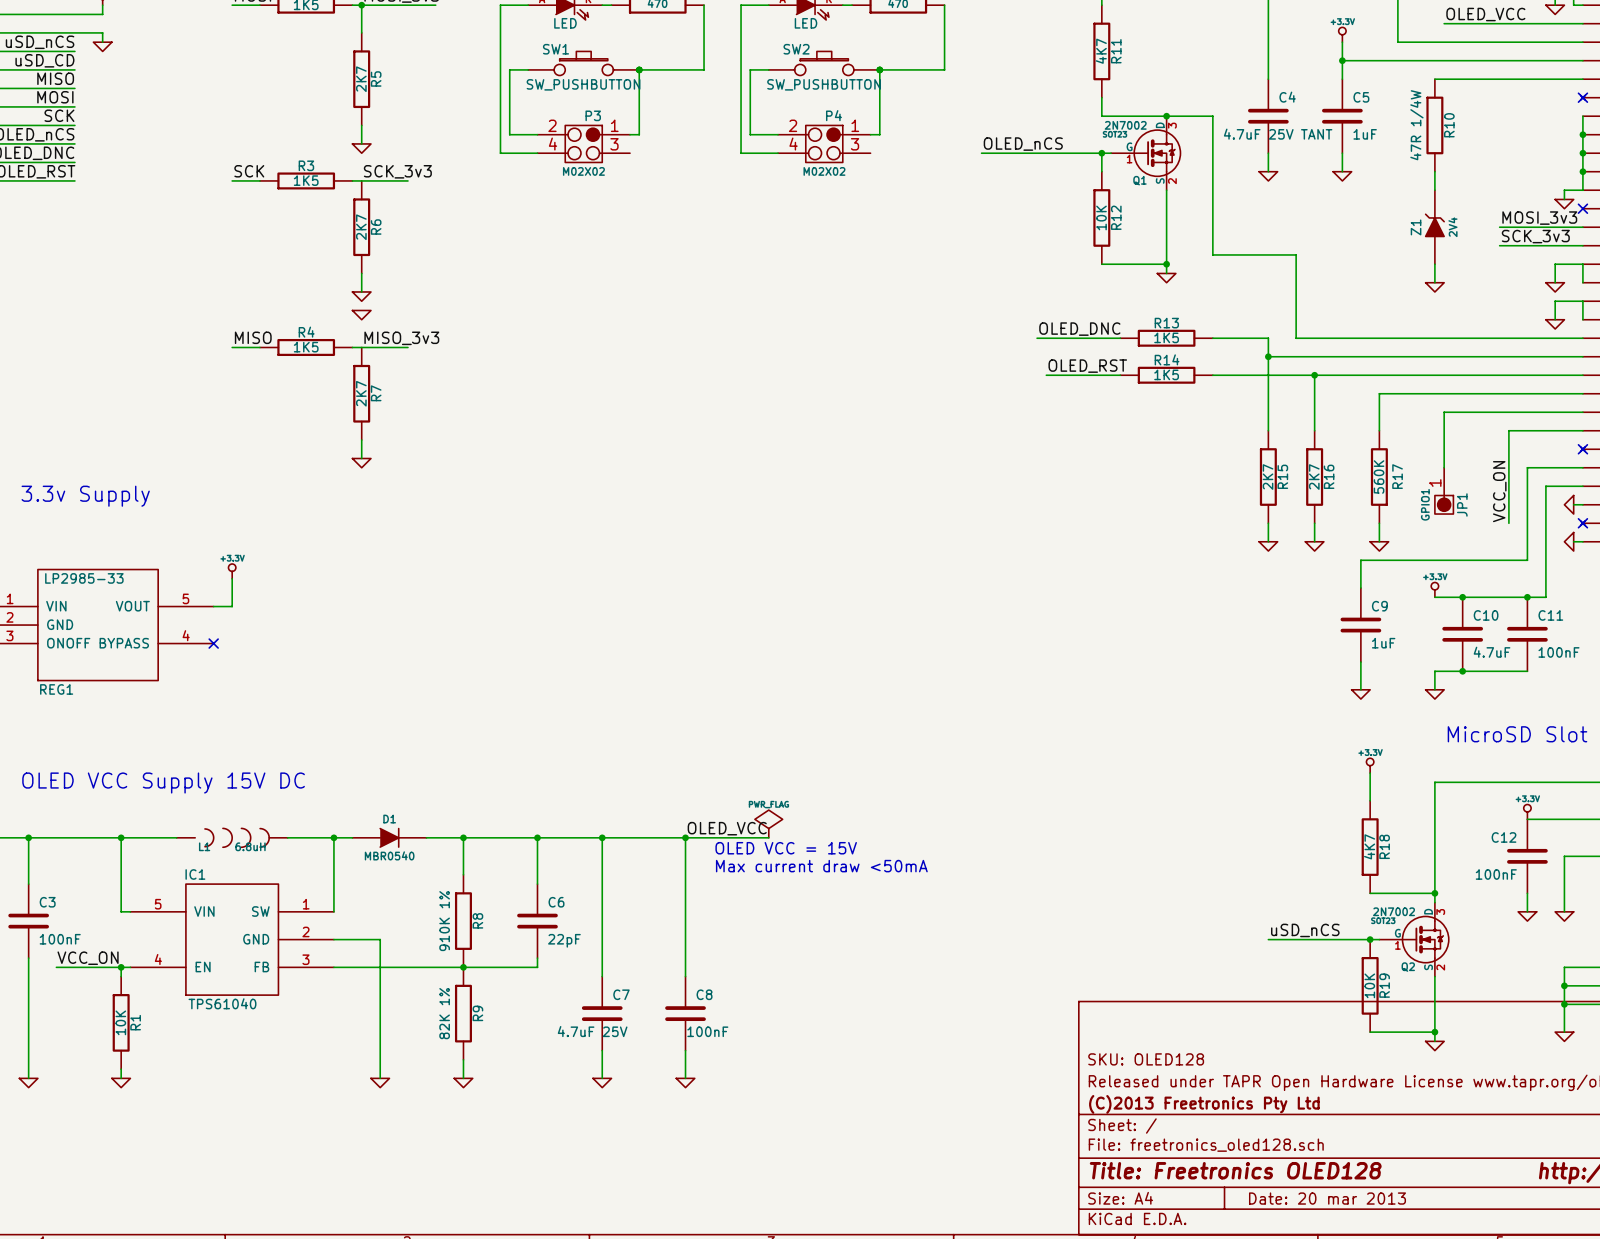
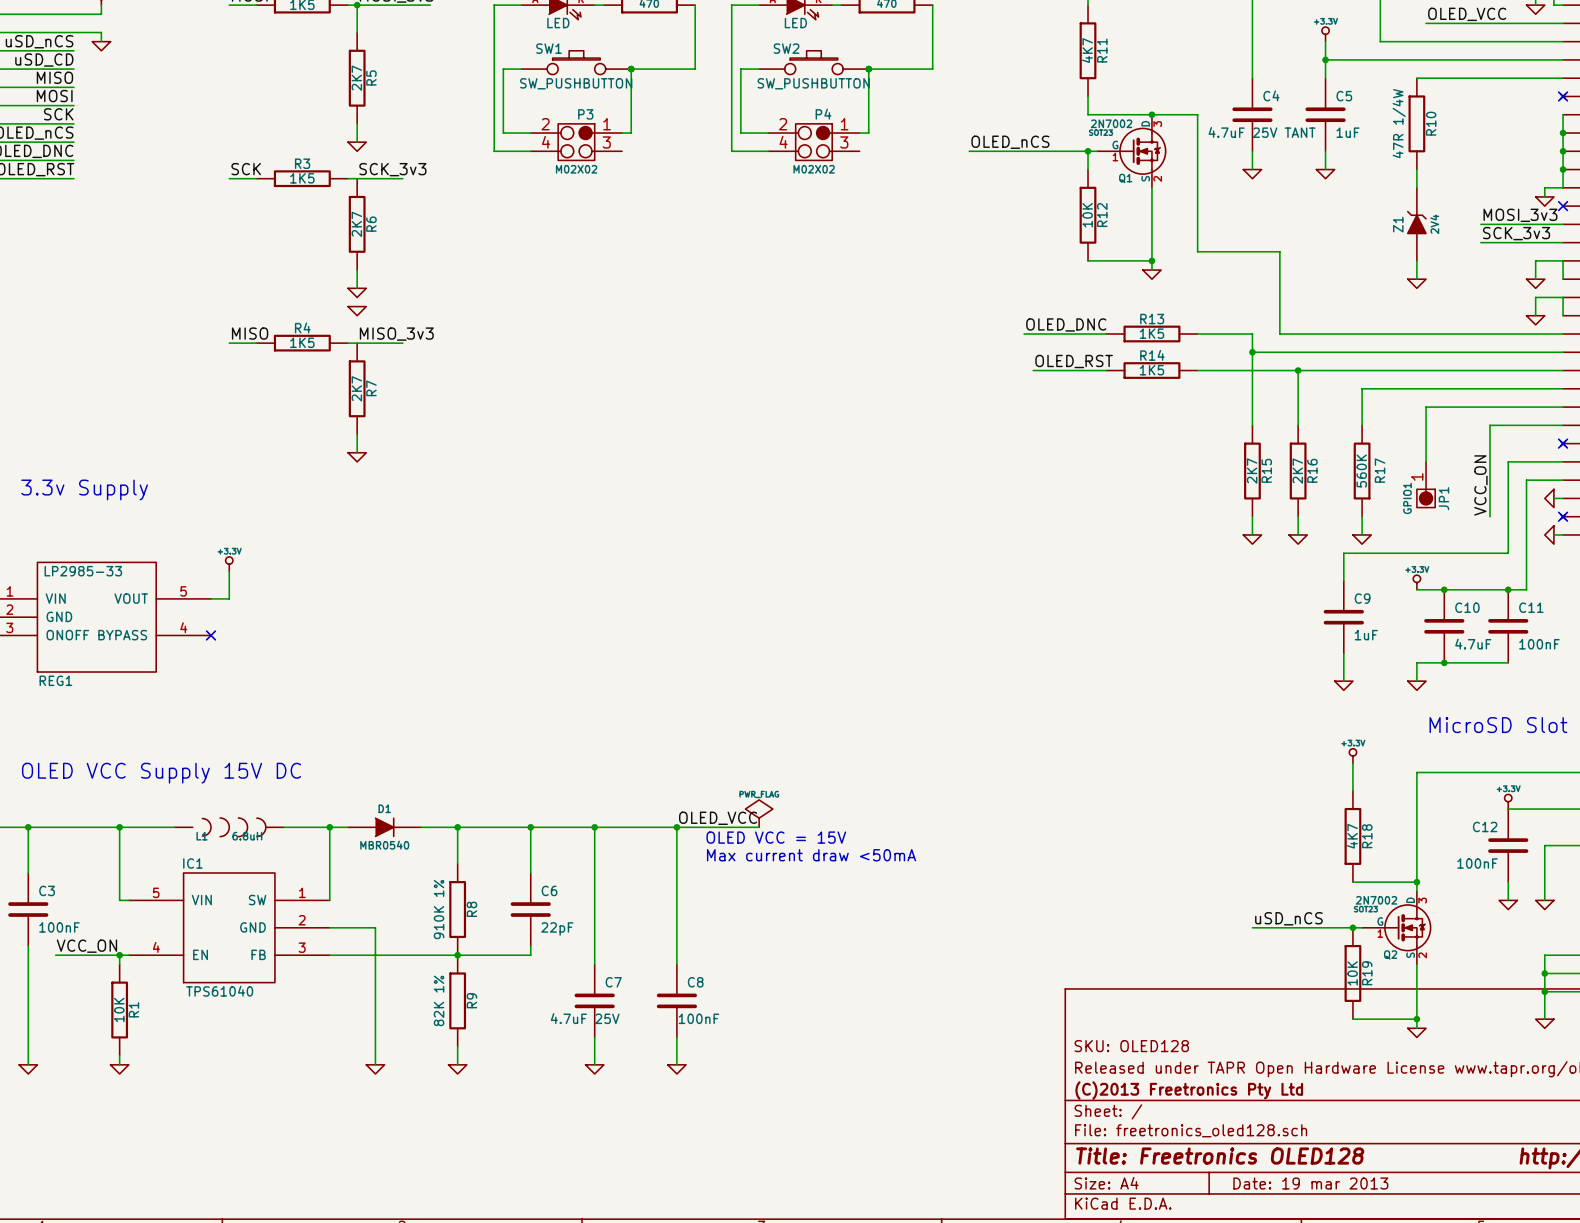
title block: Date: 20 mar 2013 (1327, 1198) -> Date: 19 mar 2013 (1310, 1183)

